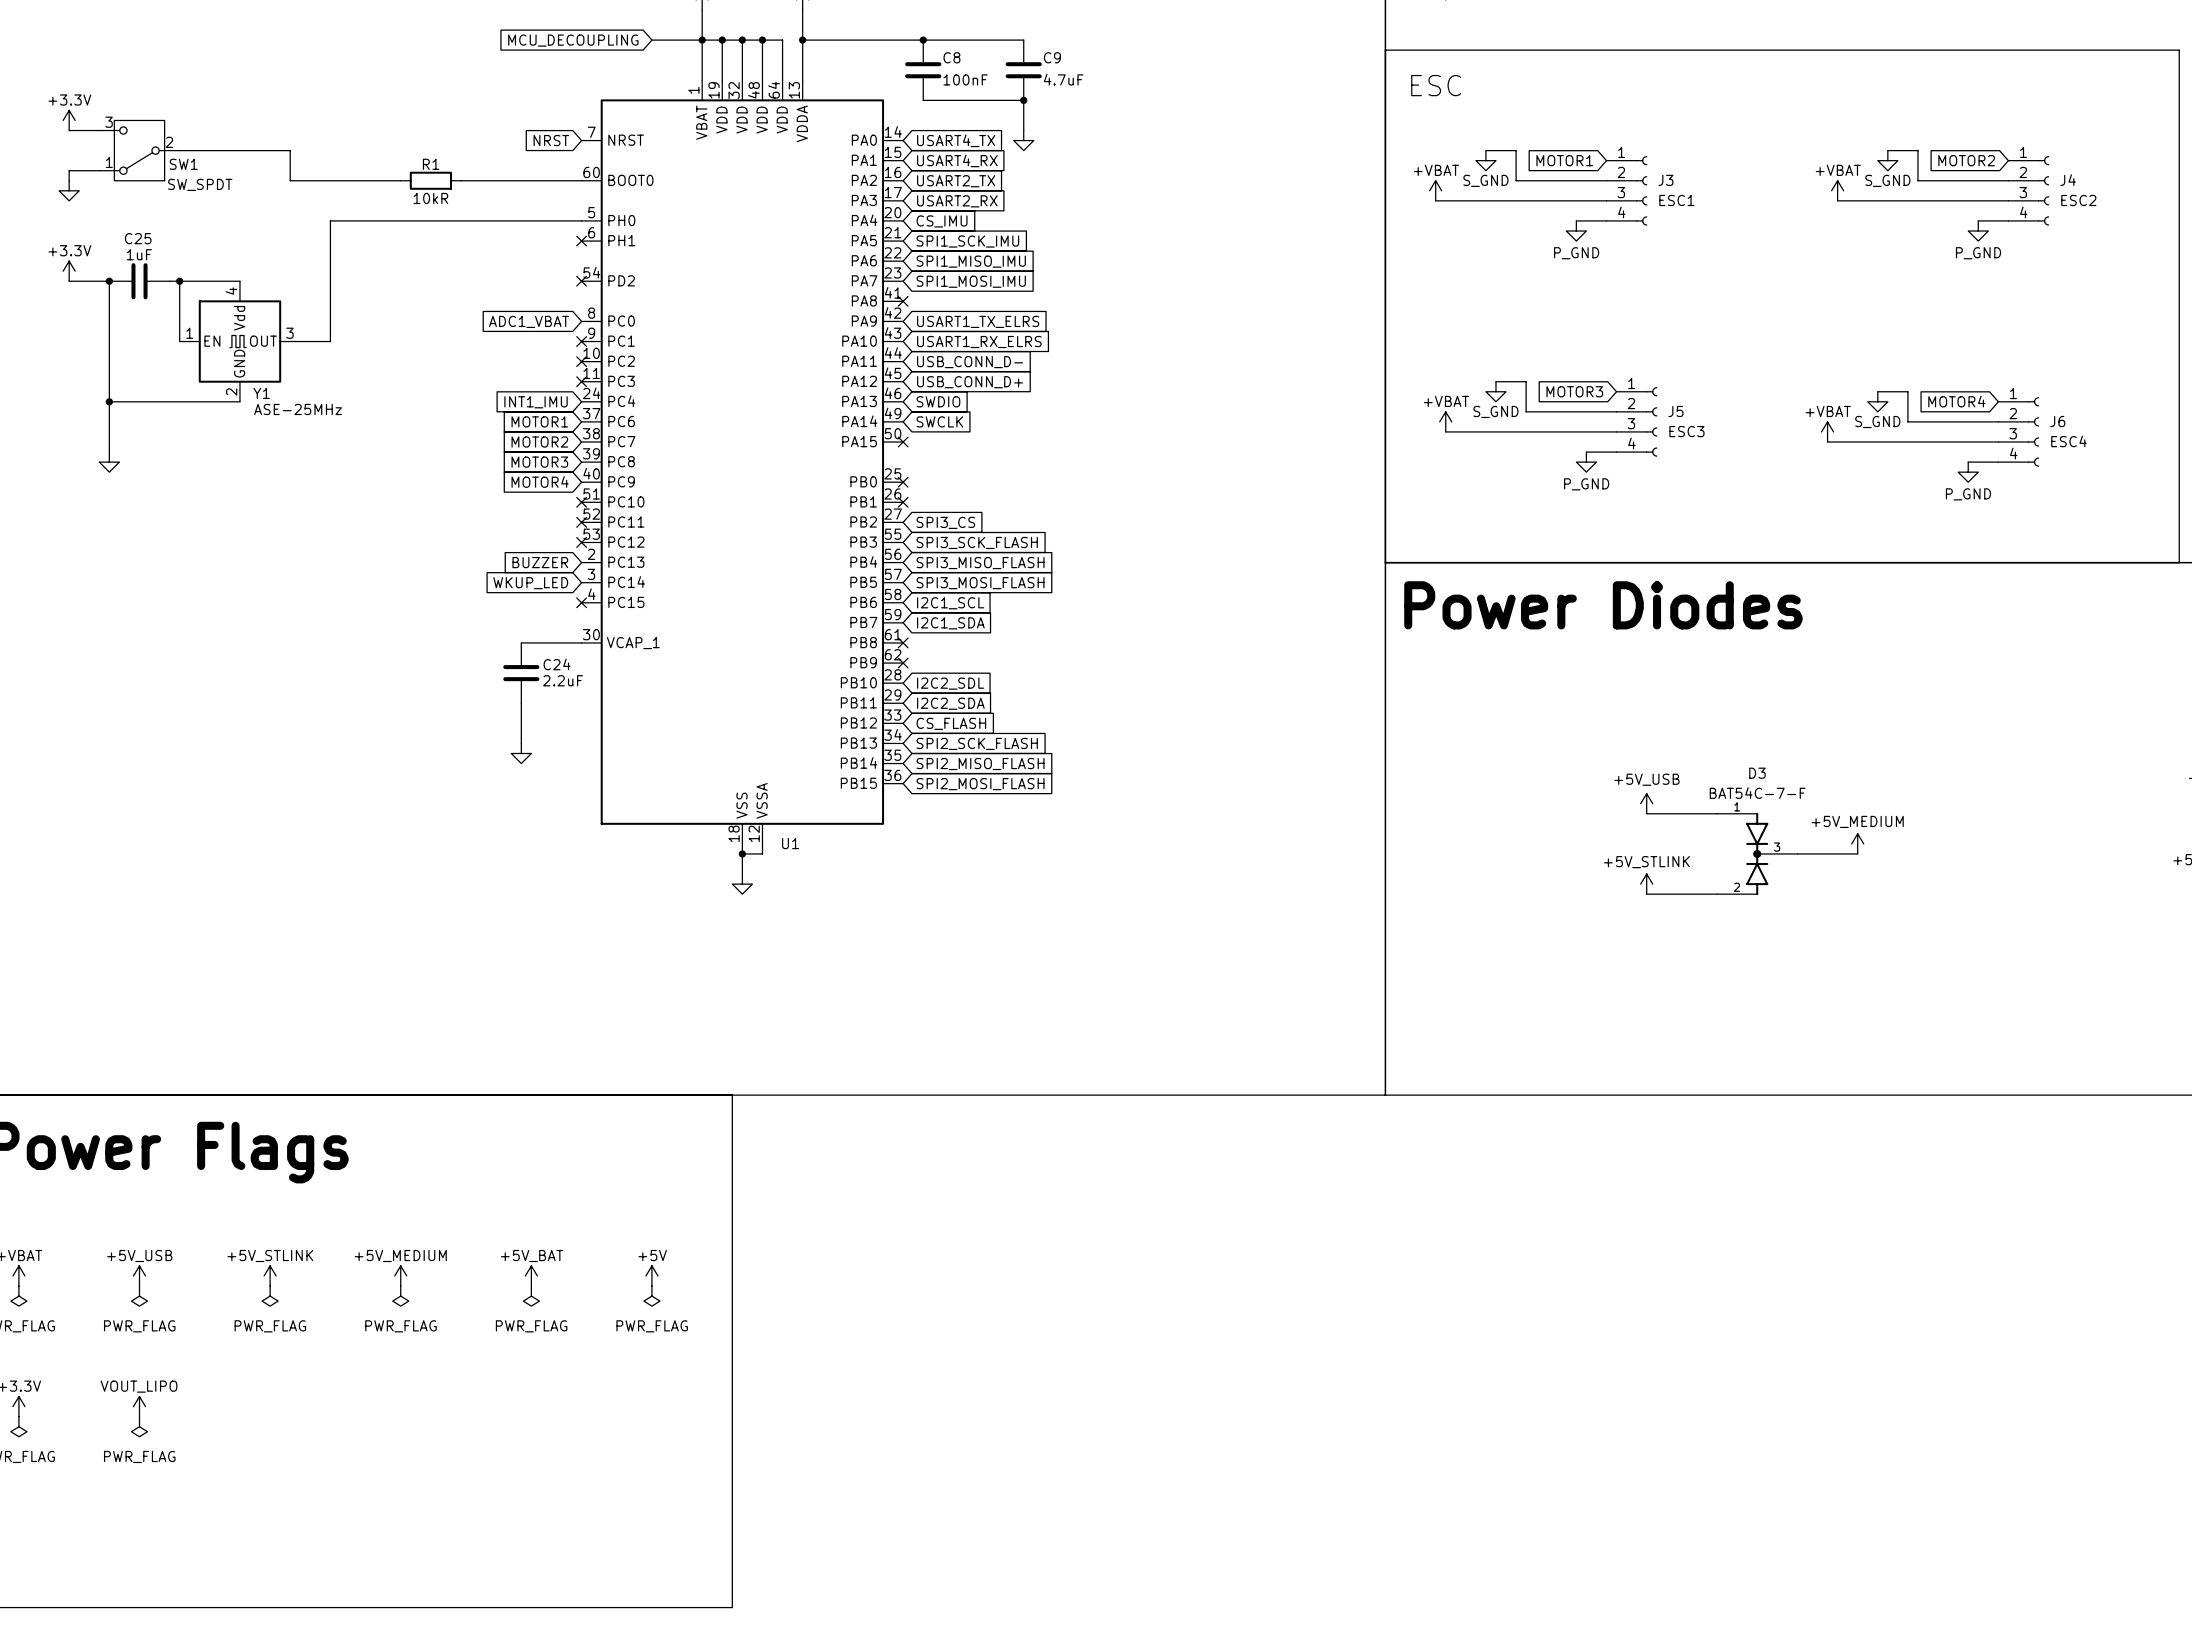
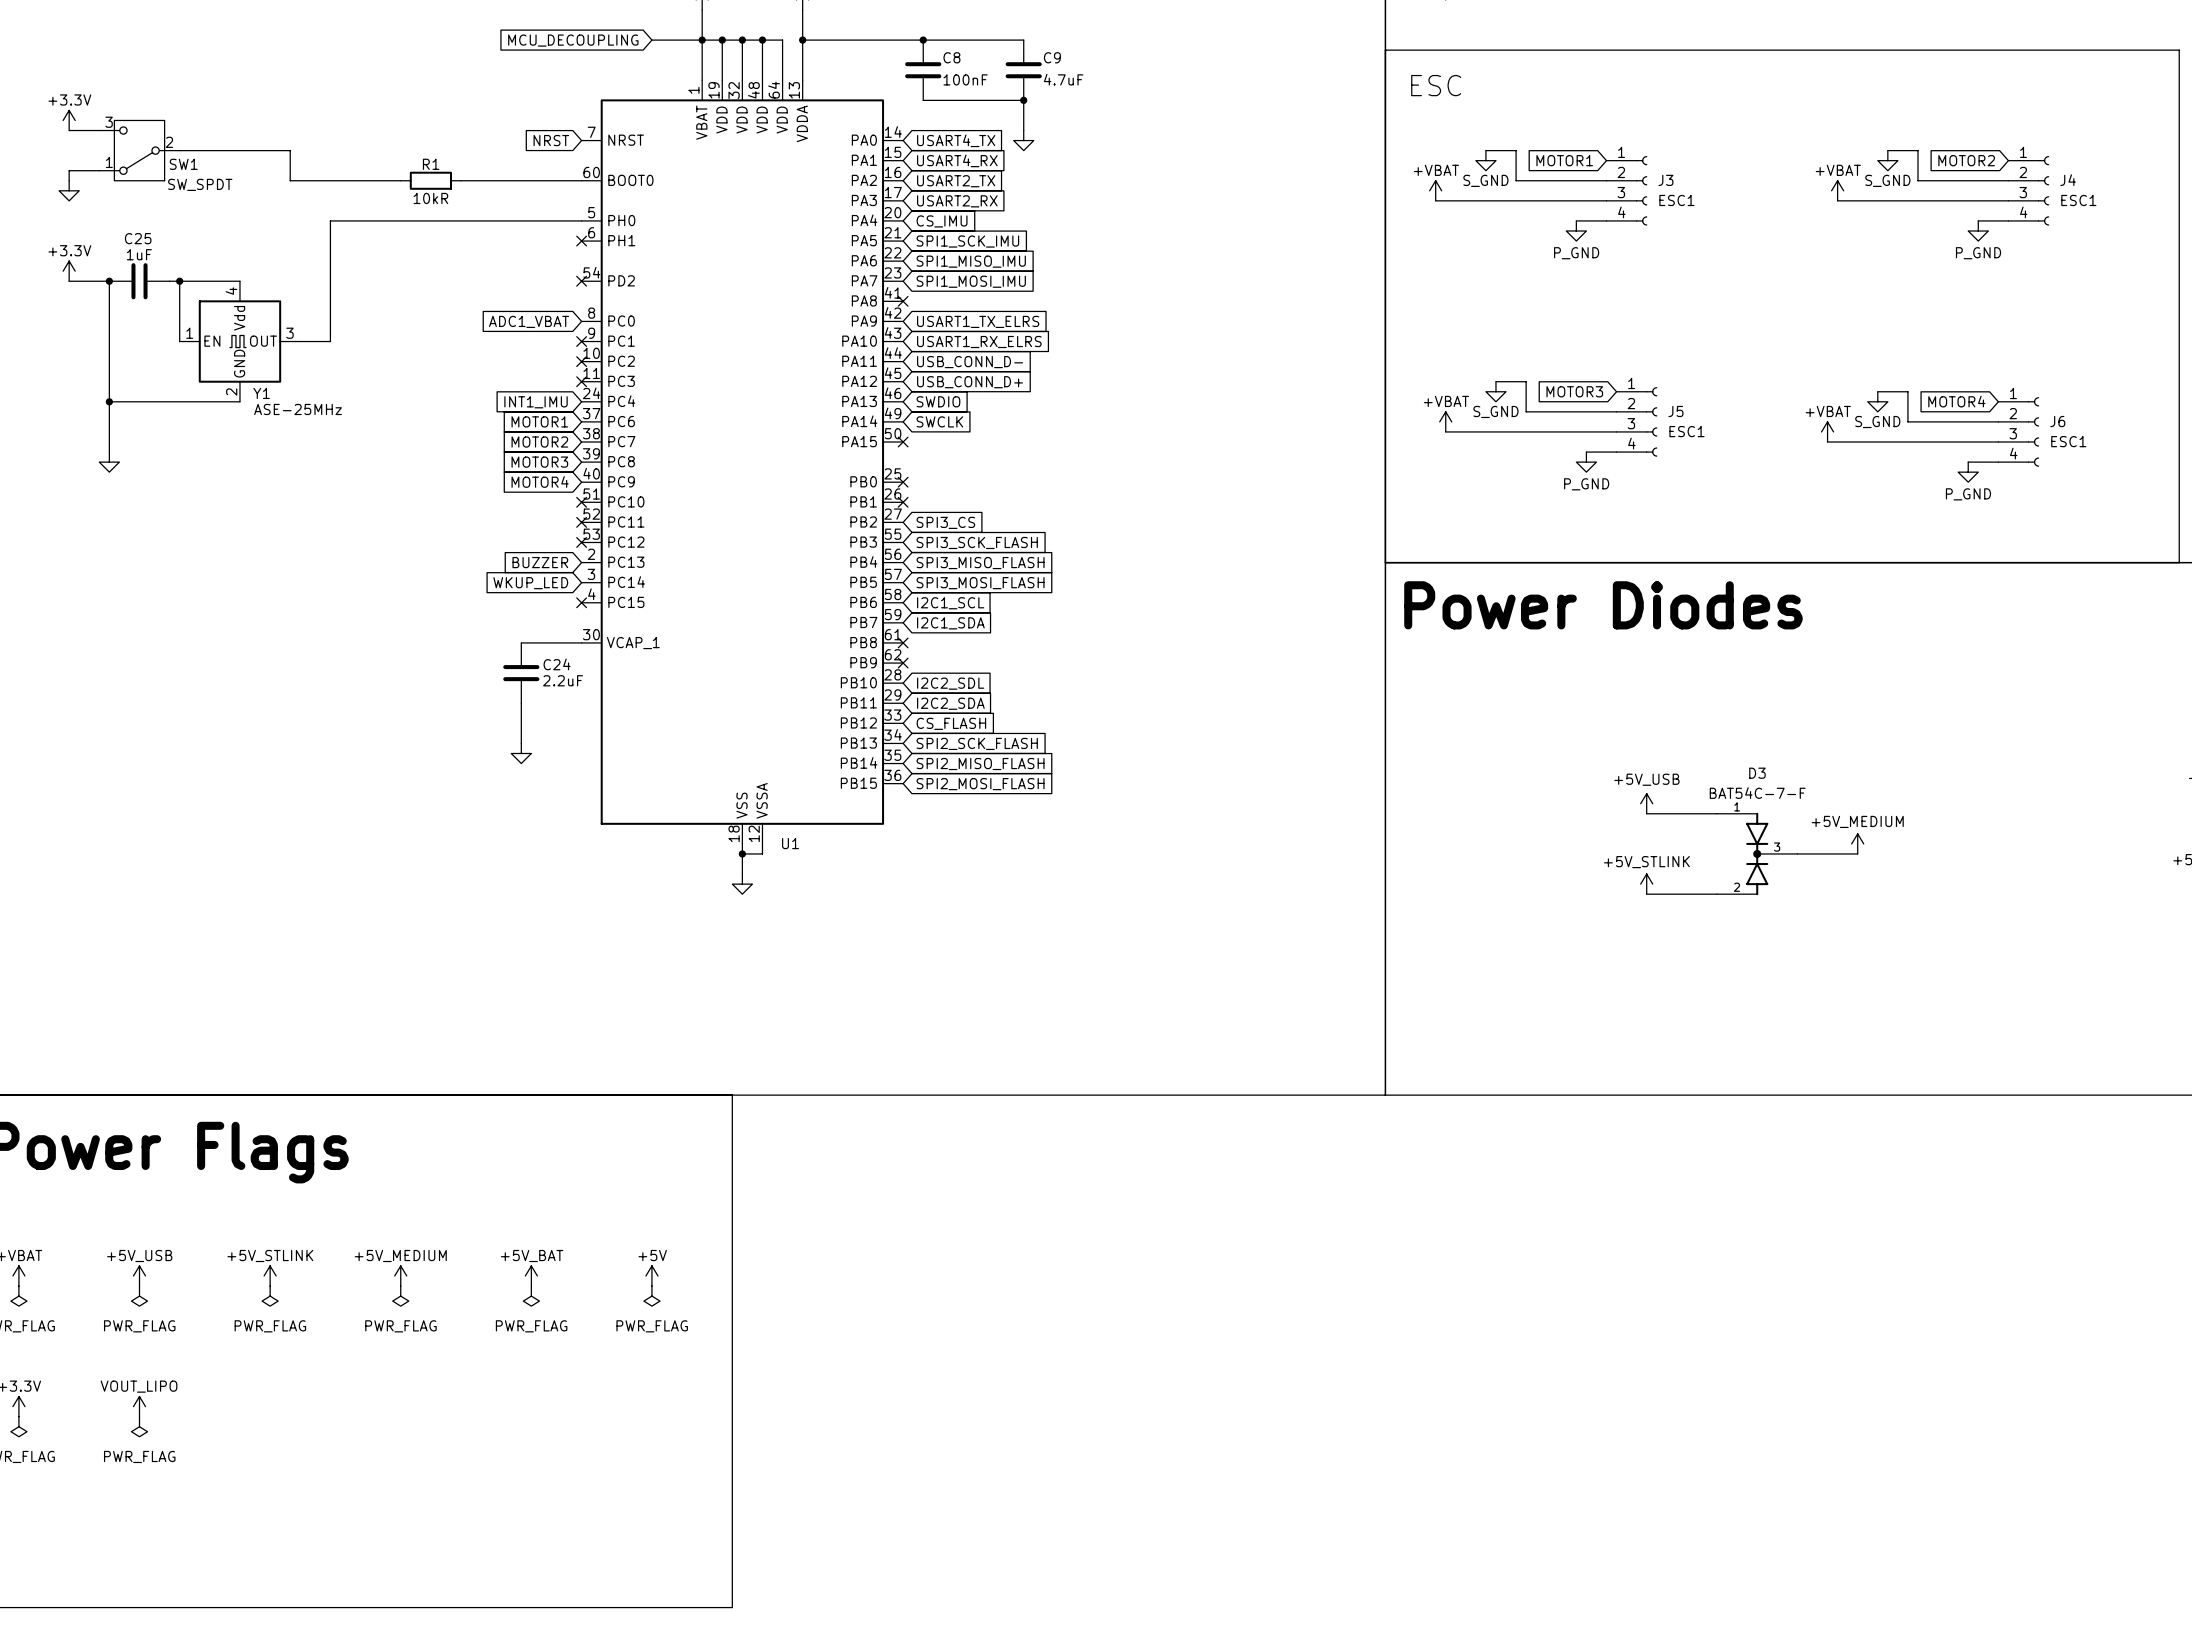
J4 value: ESC2 (2078, 200) -> ESC1 (2078, 200)
J5 value: ESC3 (1686, 431) -> ESC1 (1686, 431)
J6 value: ESC4 (2069, 441) -> ESC1 (2068, 441)

